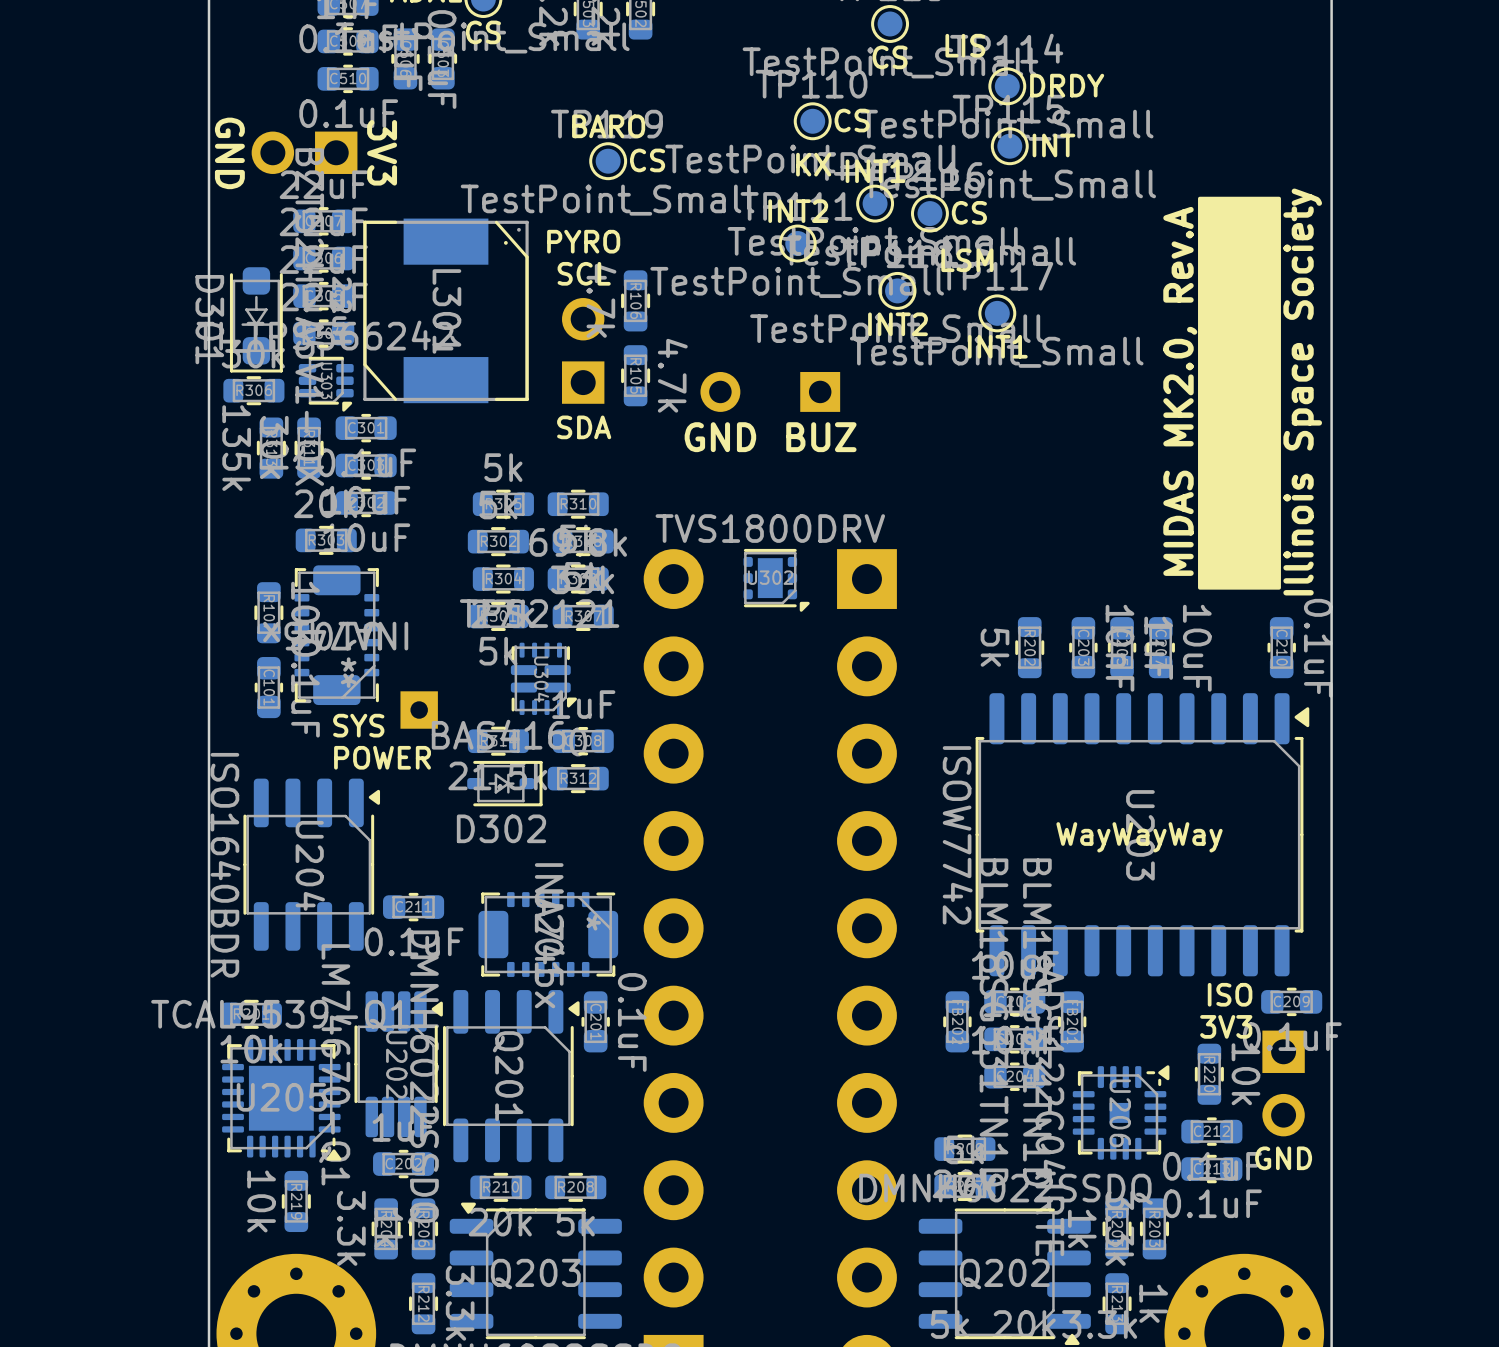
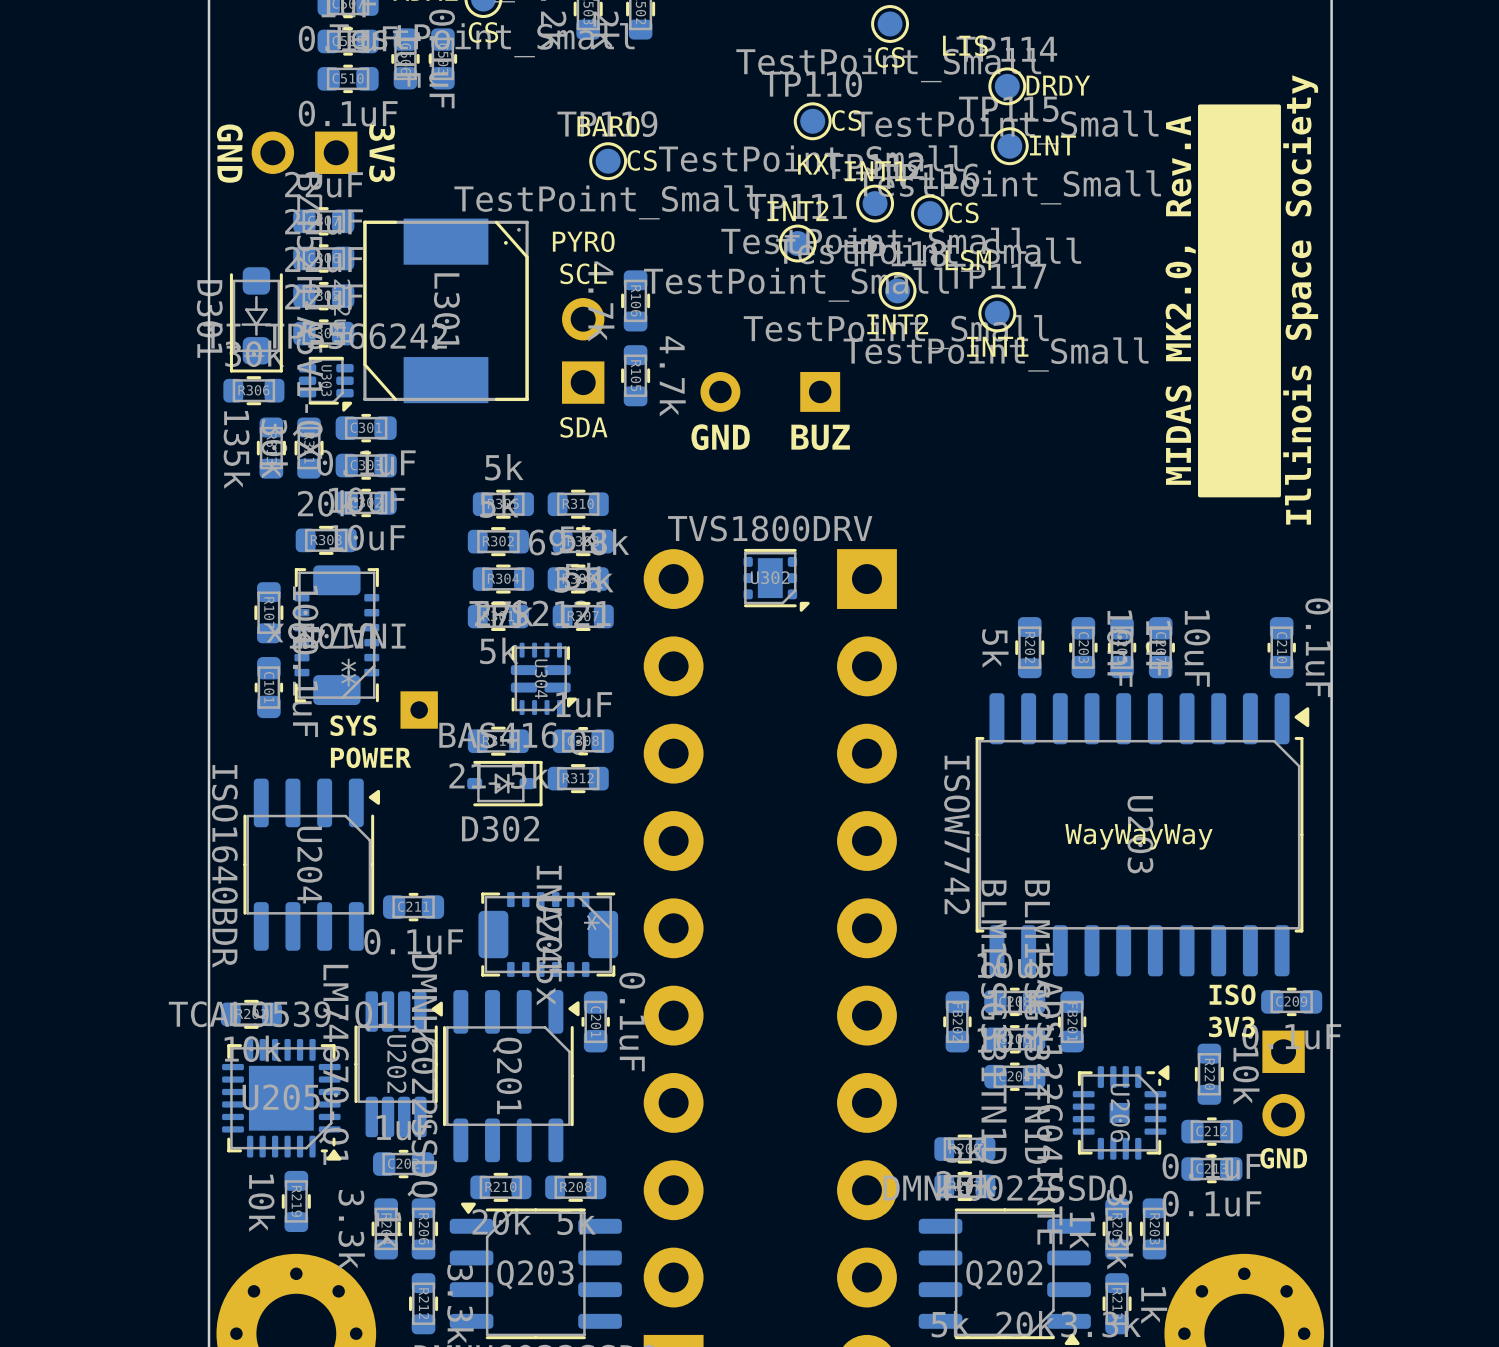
text position: MIDAS MK2.0, Rev.A (1180, 391) -> MIDAS MK2.0, Rev.A (1180, 300)
text position: Illinois Space Society (1302, 392) -> Illinois Space Society (1300, 299)
drawing position: (1239, 393) -> (1239, 300)

